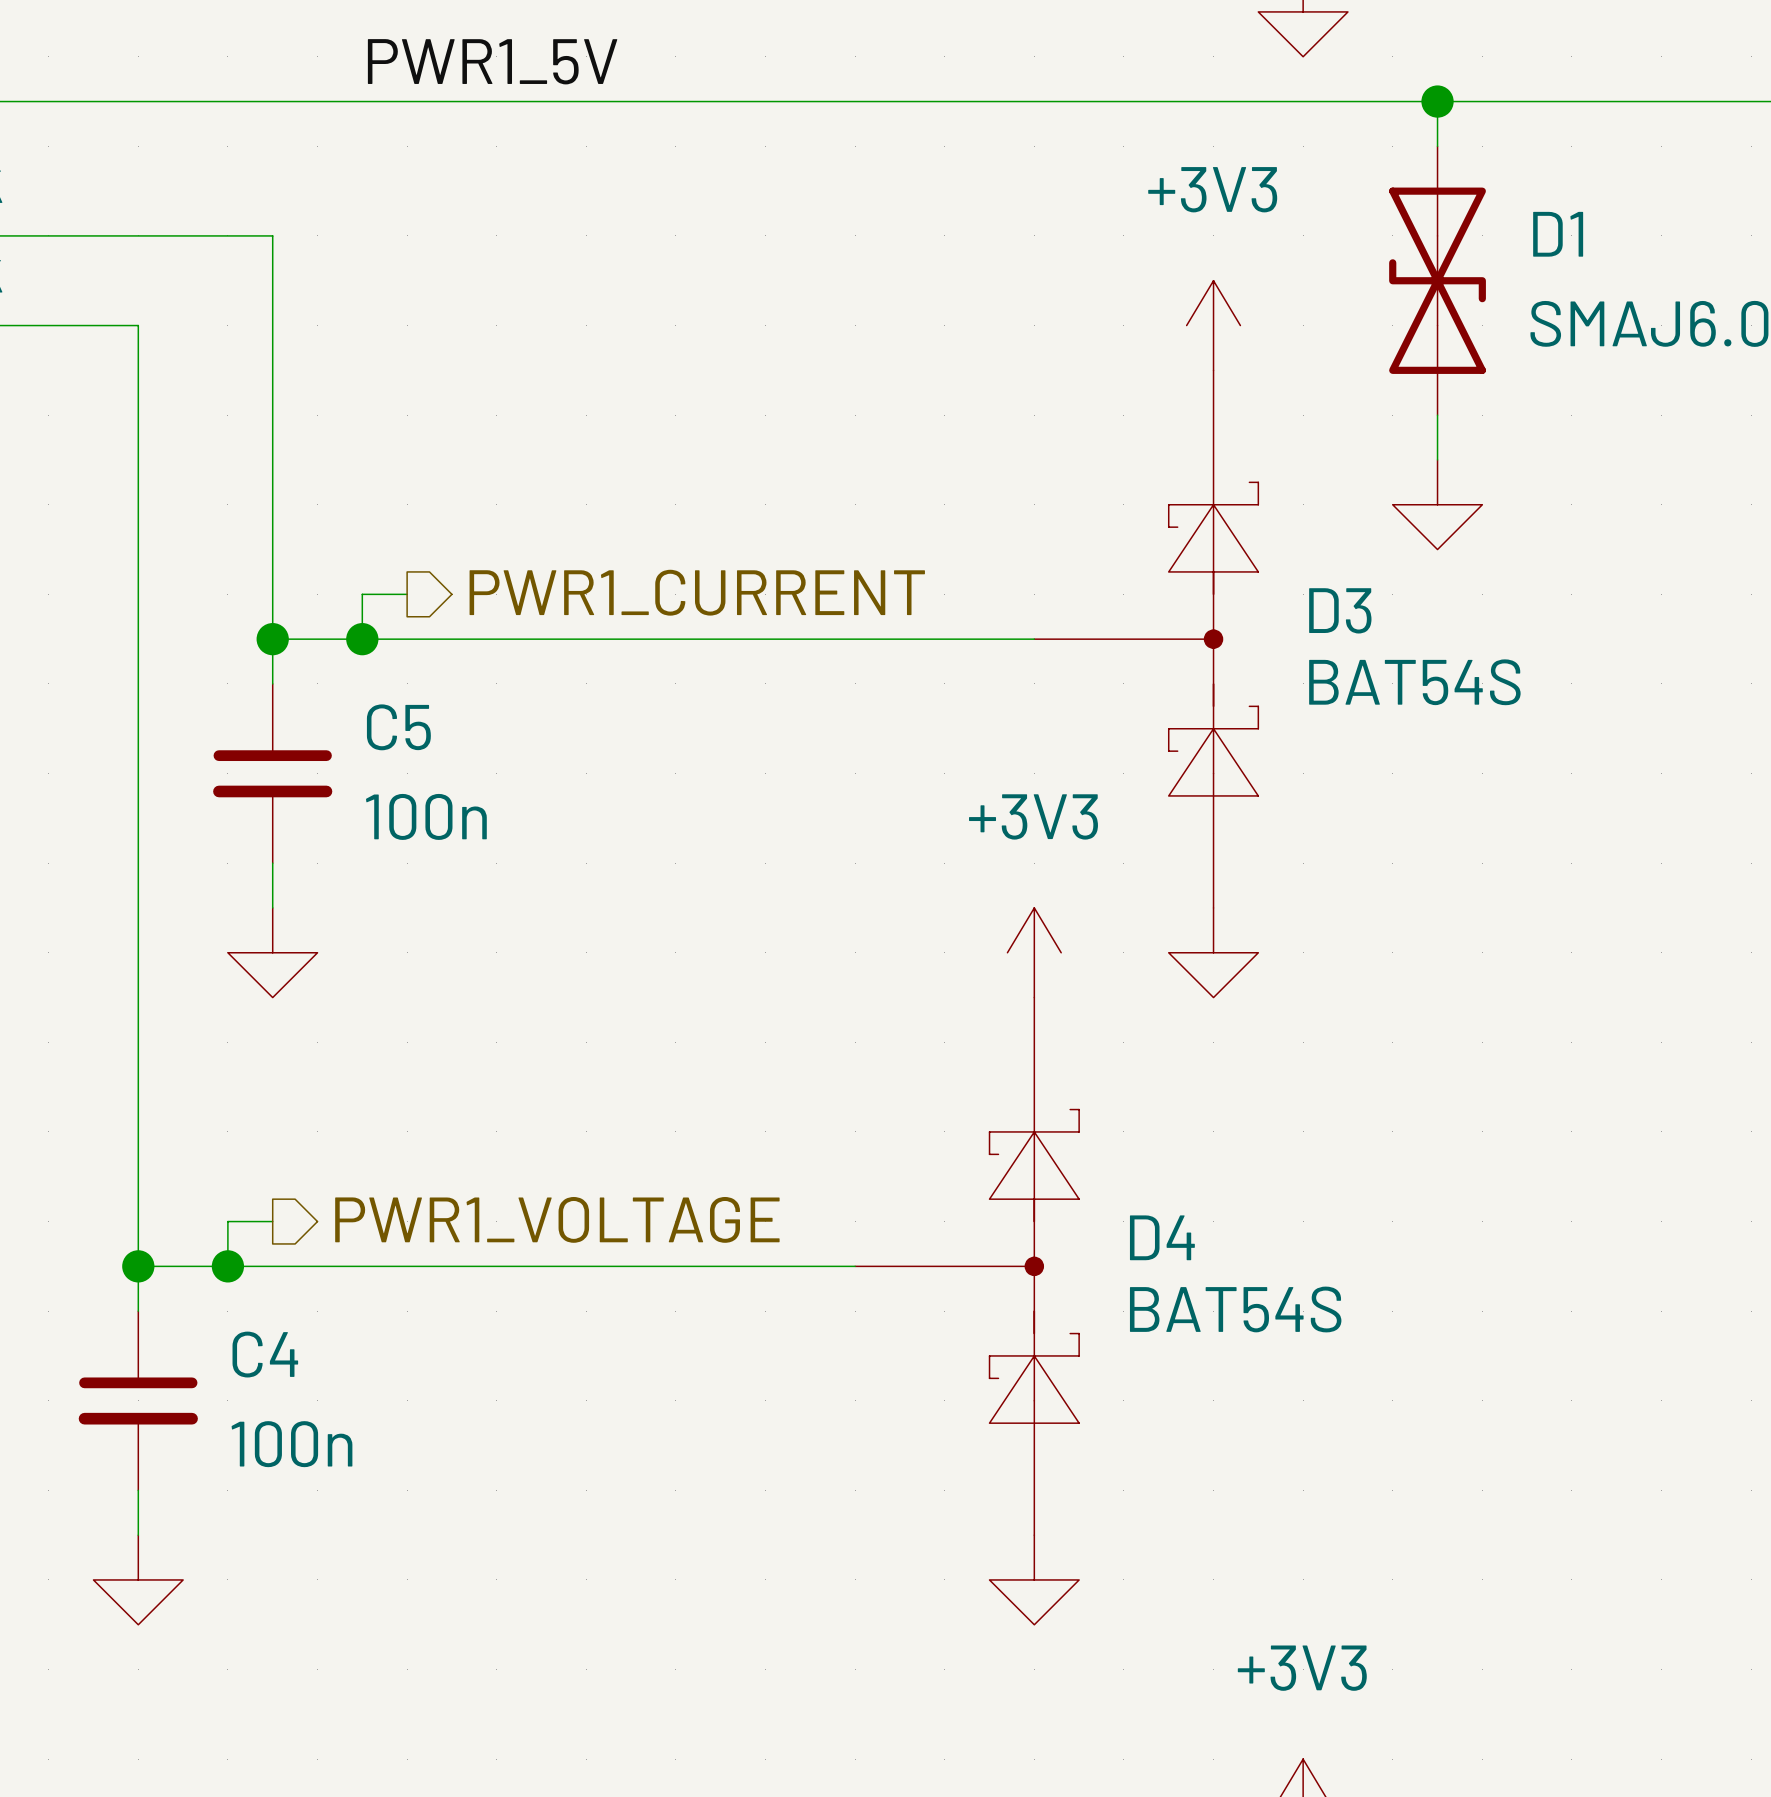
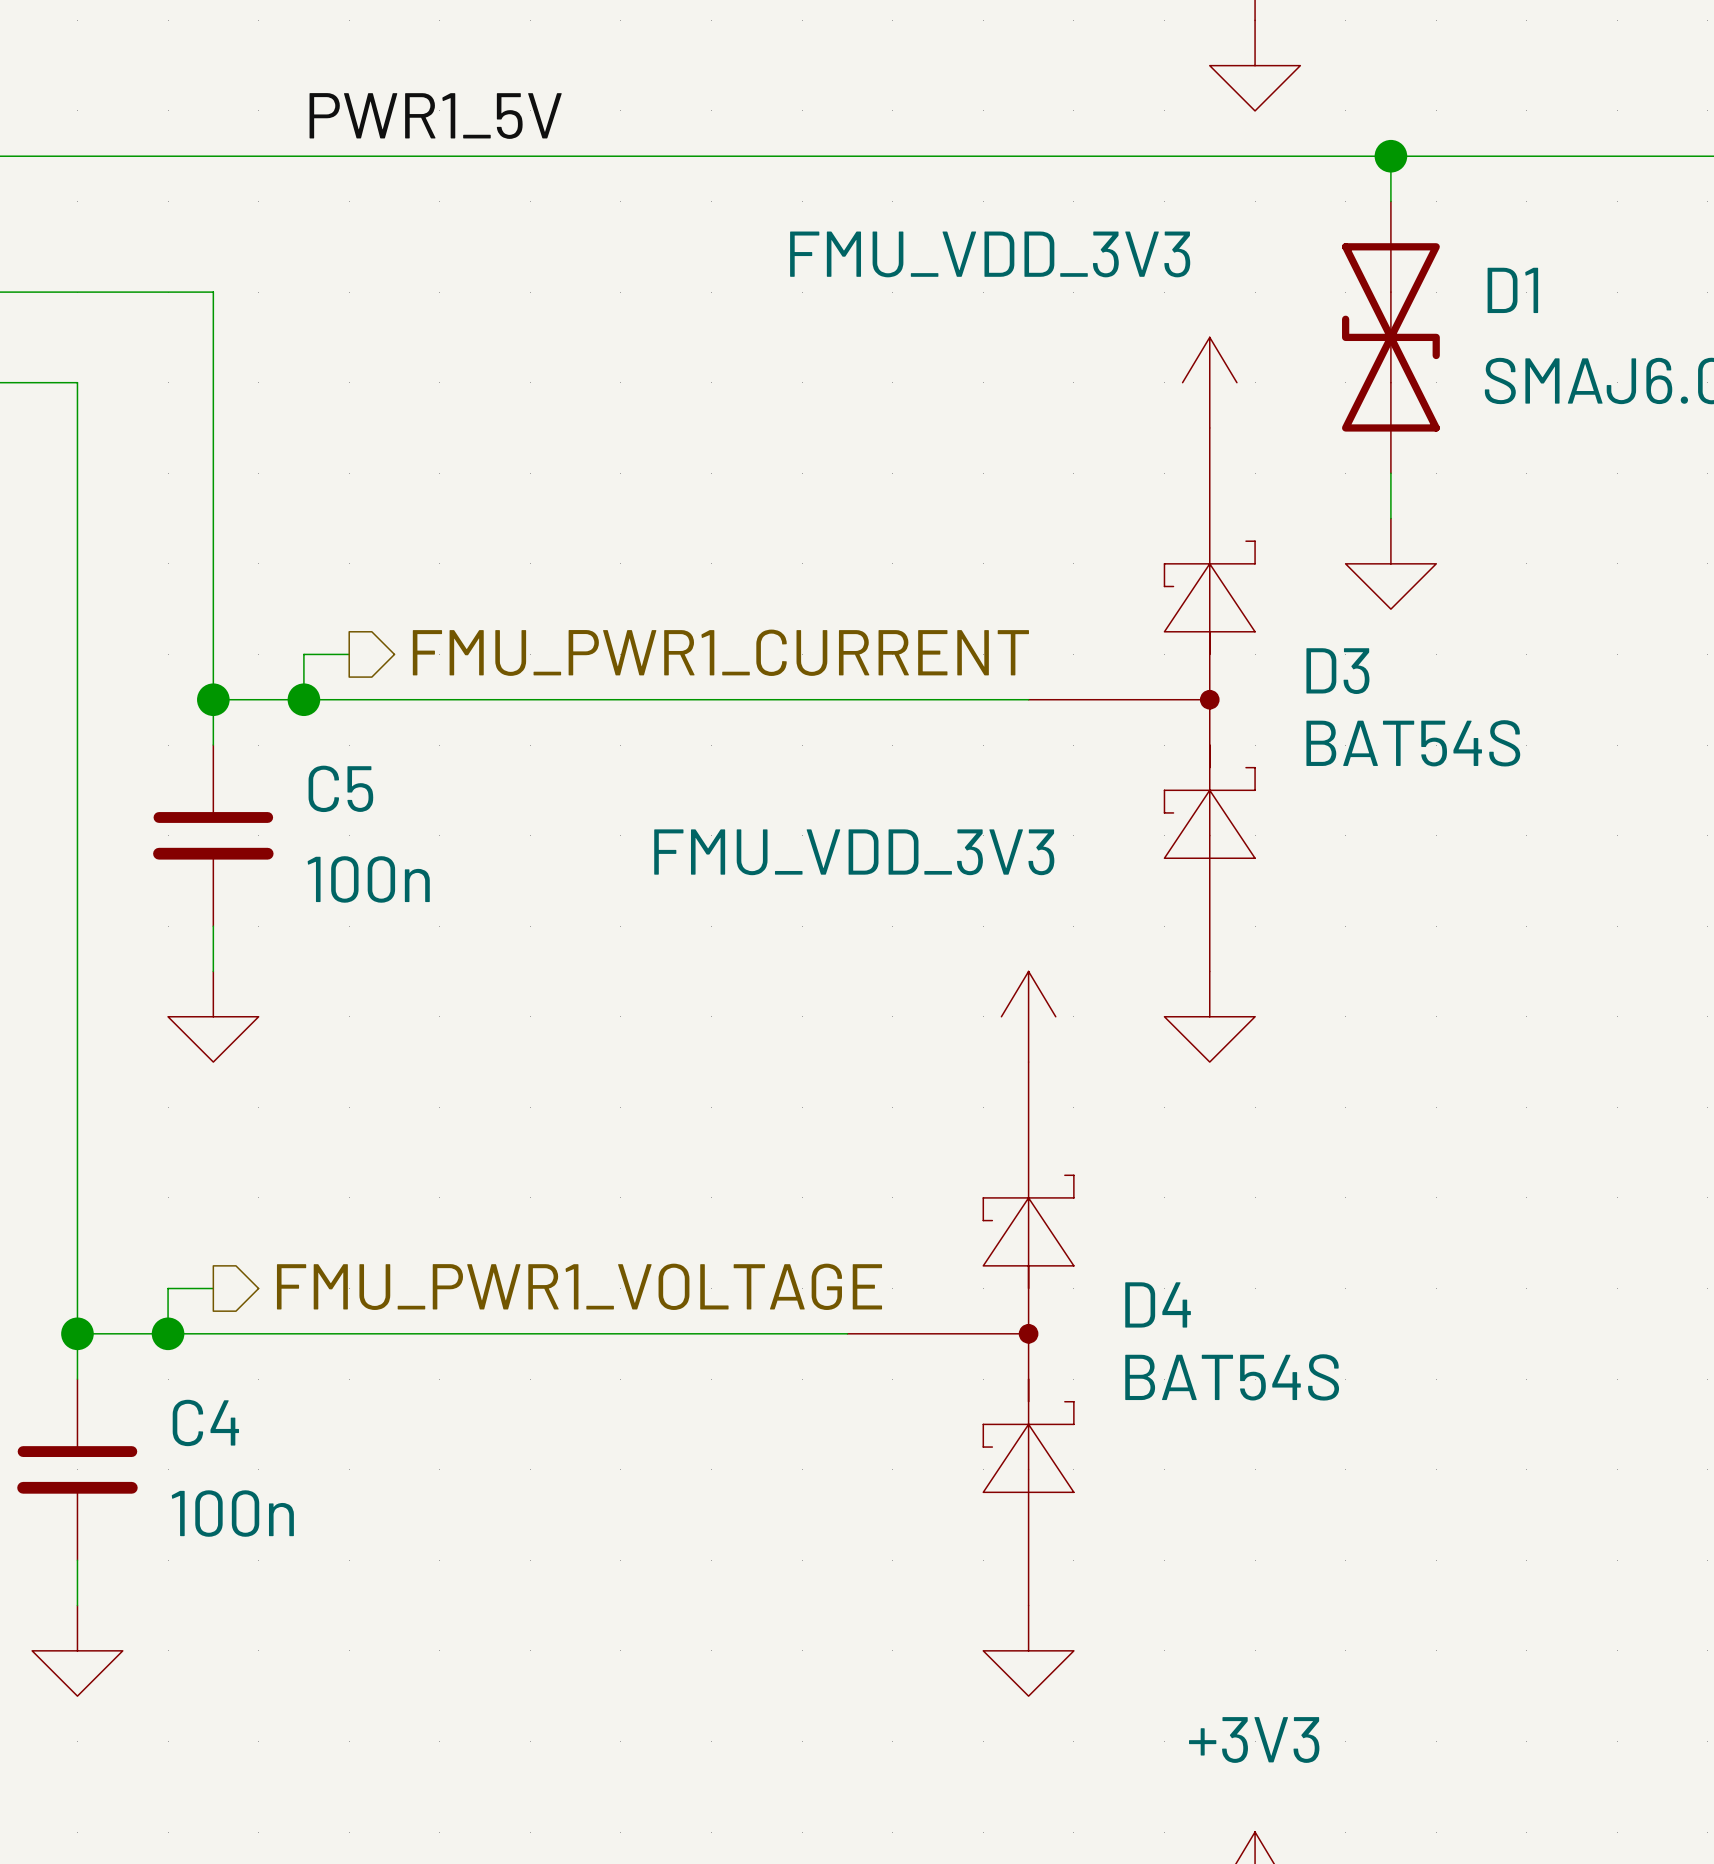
power symbol: +3V3 (1213, 325) -> none
power symbol: none -> FMU_VDD_3V3 (1209, 382)
hierarchical label: PWR1_CURRENT (697, 592) -> FMU_PWR1_CURRENT (720, 652)
D3 position: (1146, 639) -> (1141, 699)
power symbol: +3V3 (1034, 952) -> none
power symbol: none -> FMU_VDD_3V3 (1028, 1016)
power symbol position: (1213, 952) -> (1209, 1016)
hierarchical label: PWR1_VOLTAGE (557, 1219) -> FMU_PWR1_VOLTAGE (579, 1286)
D4 position: (967, 1266) -> (960, 1333)
power symbol position: (1034, 1579) -> (1028, 1650)

